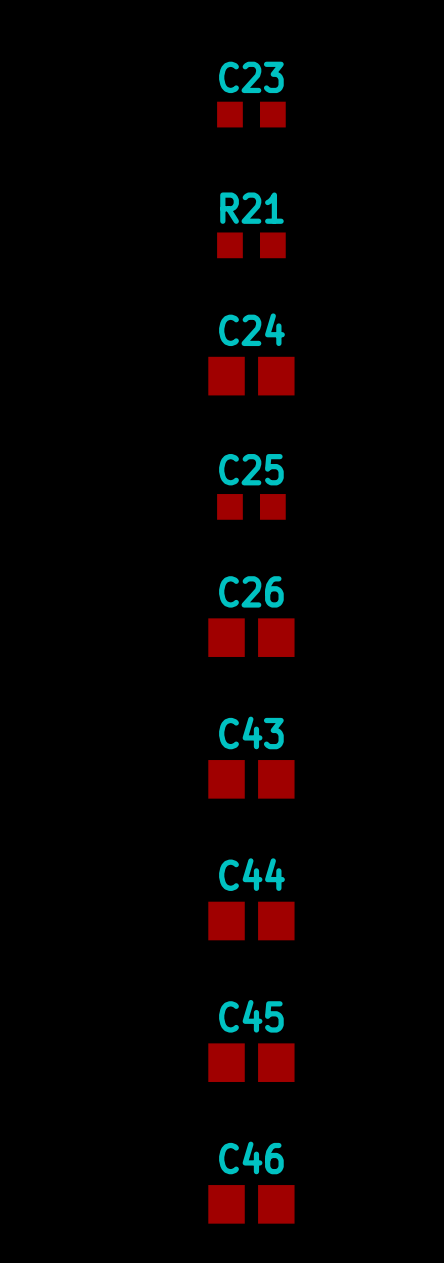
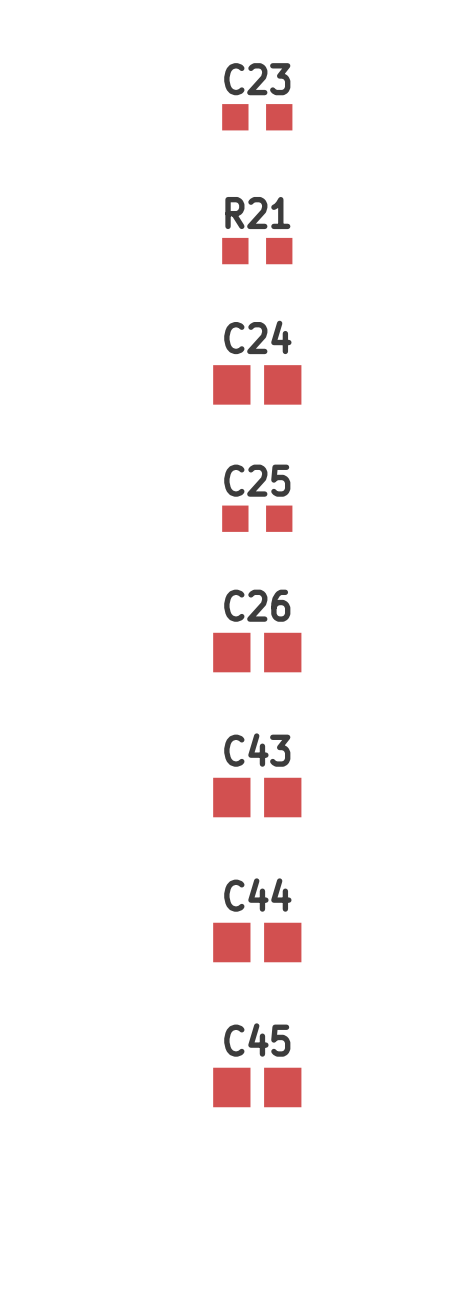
C46: (251, 1204) -> none

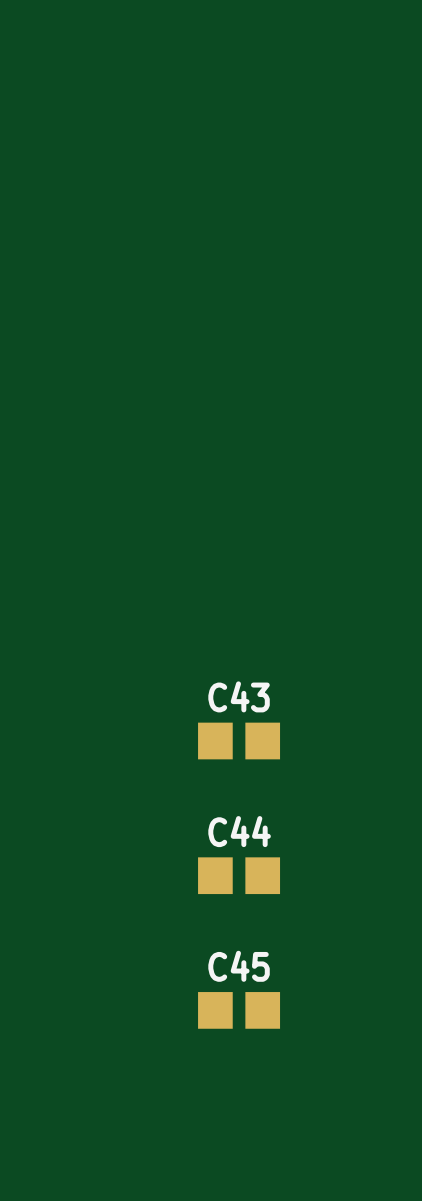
C23: (257, 117) -> none
R21: (257, 251) -> none
C24: (257, 384) -> none
C25: (257, 518) -> none
C26: (257, 652) -> none

